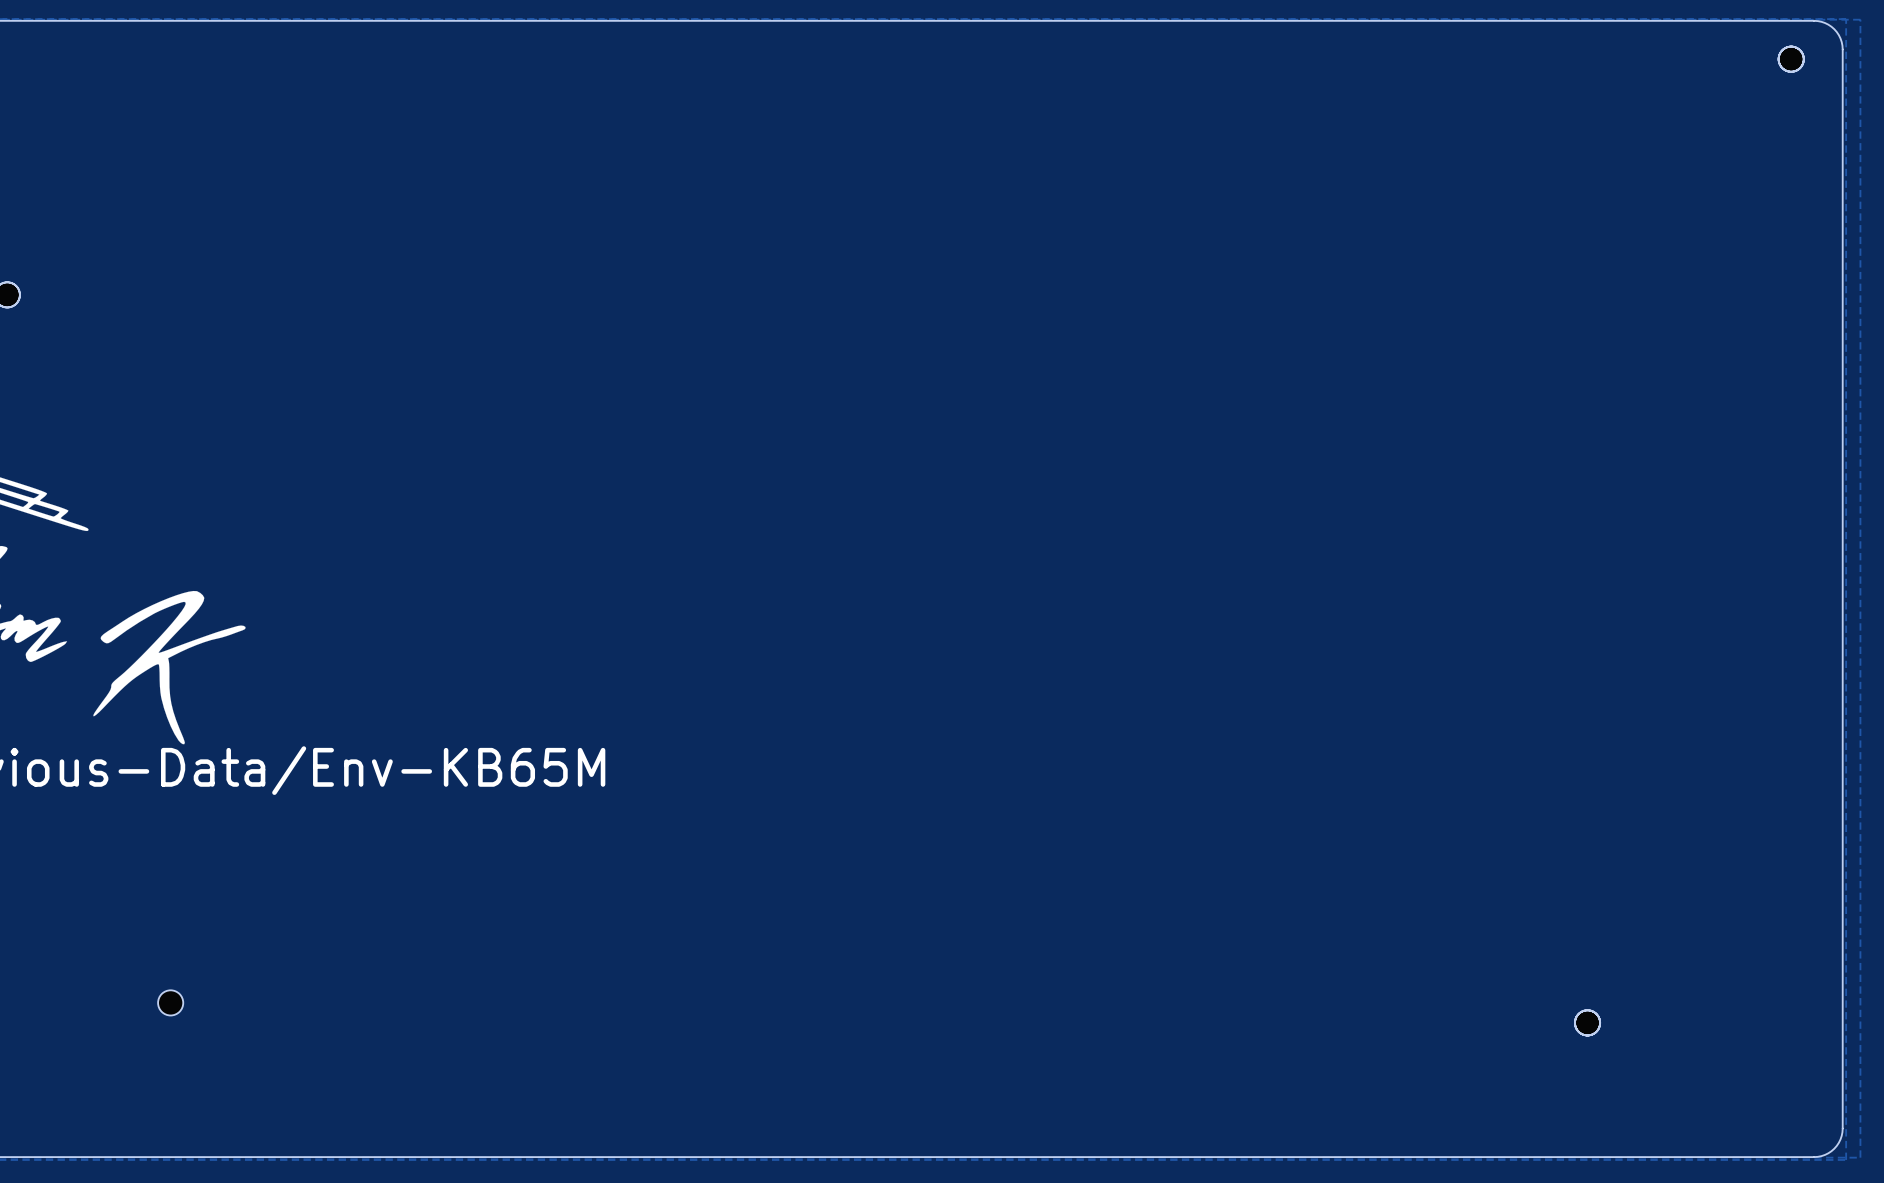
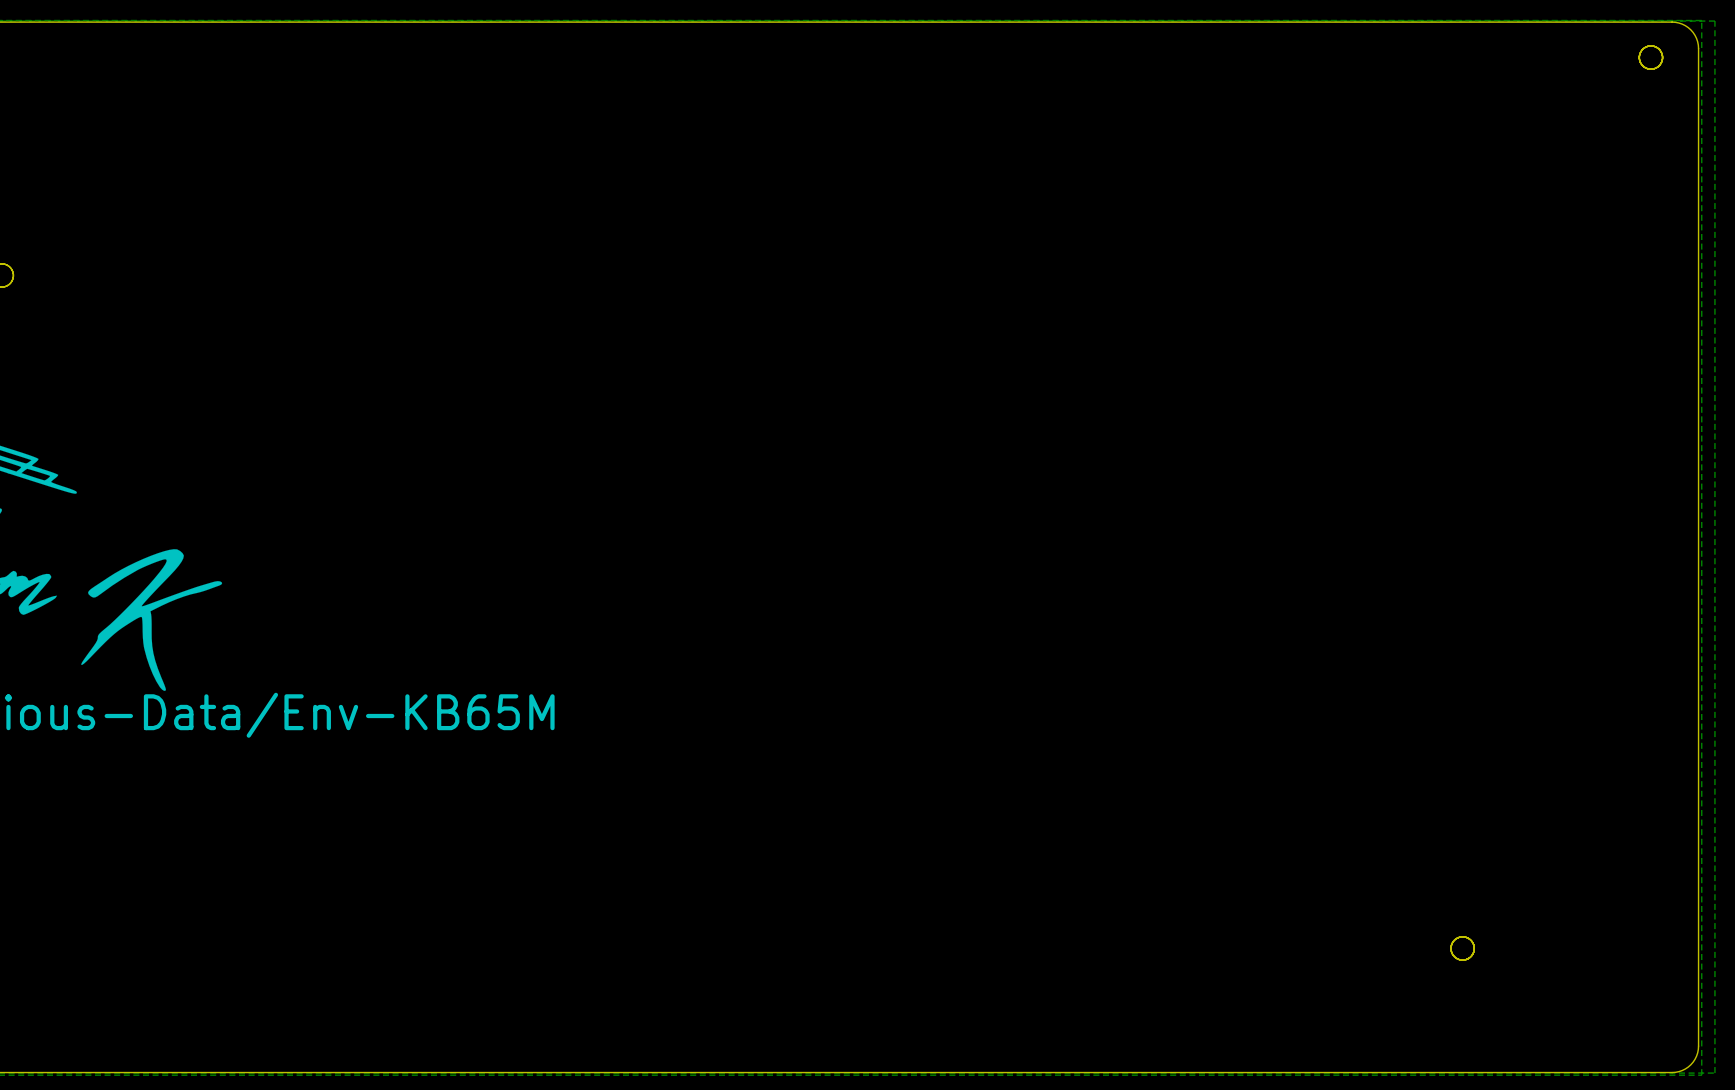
part: (170, 1002) -> none

